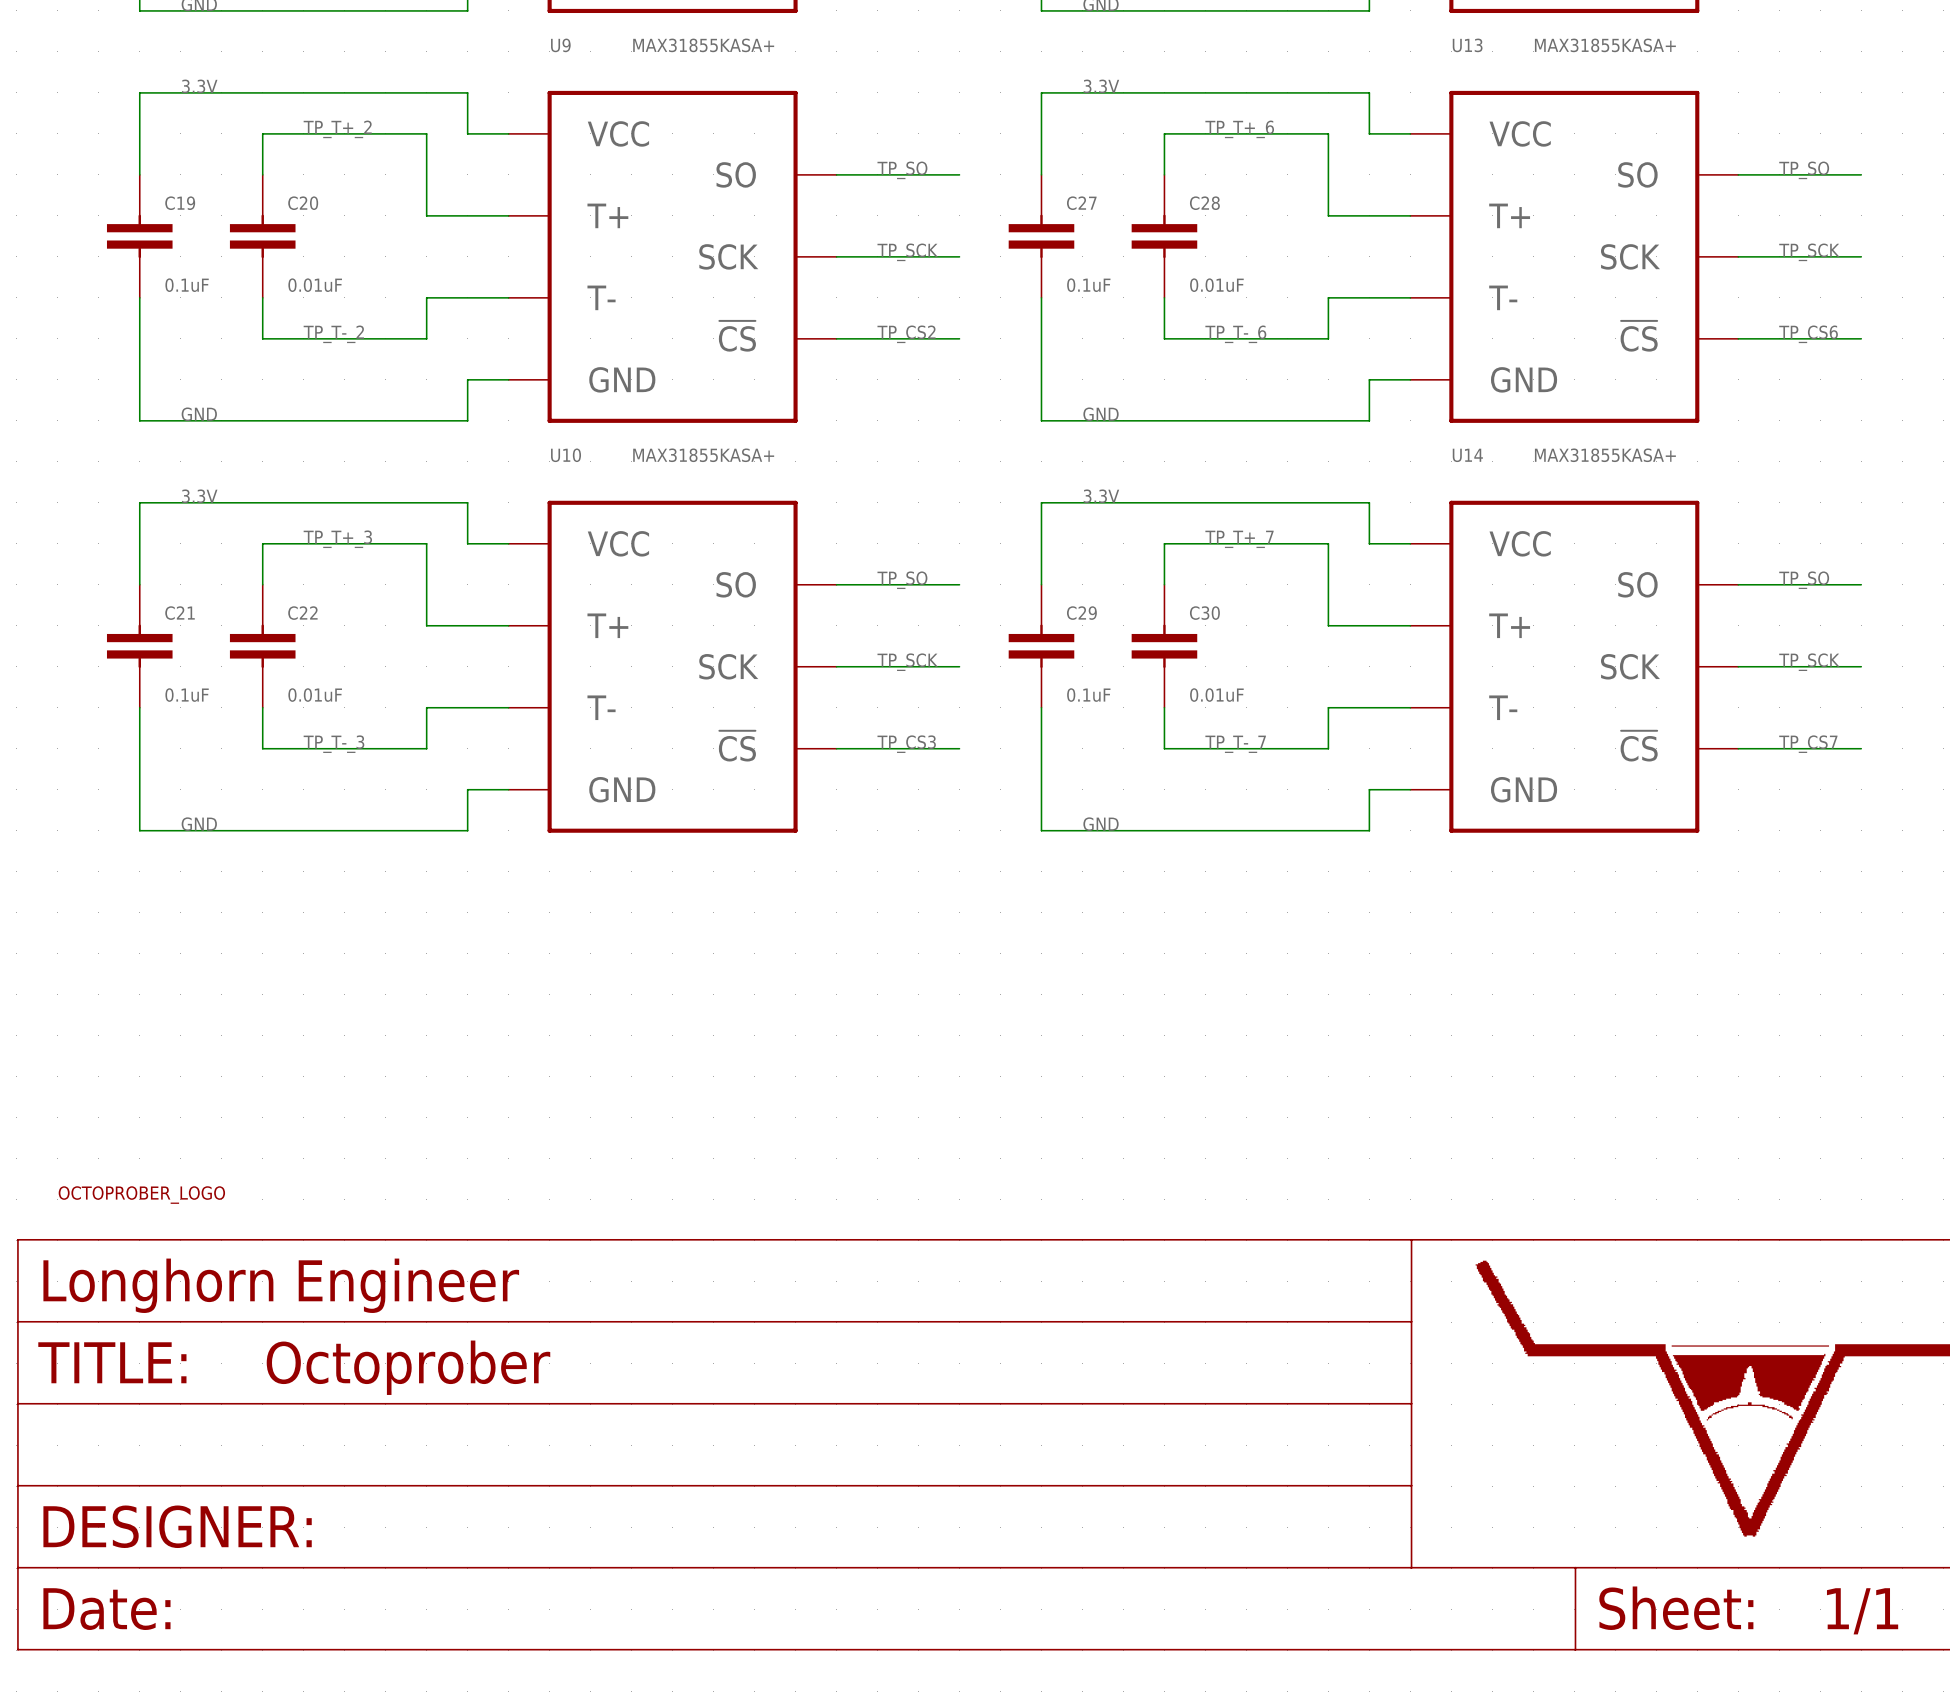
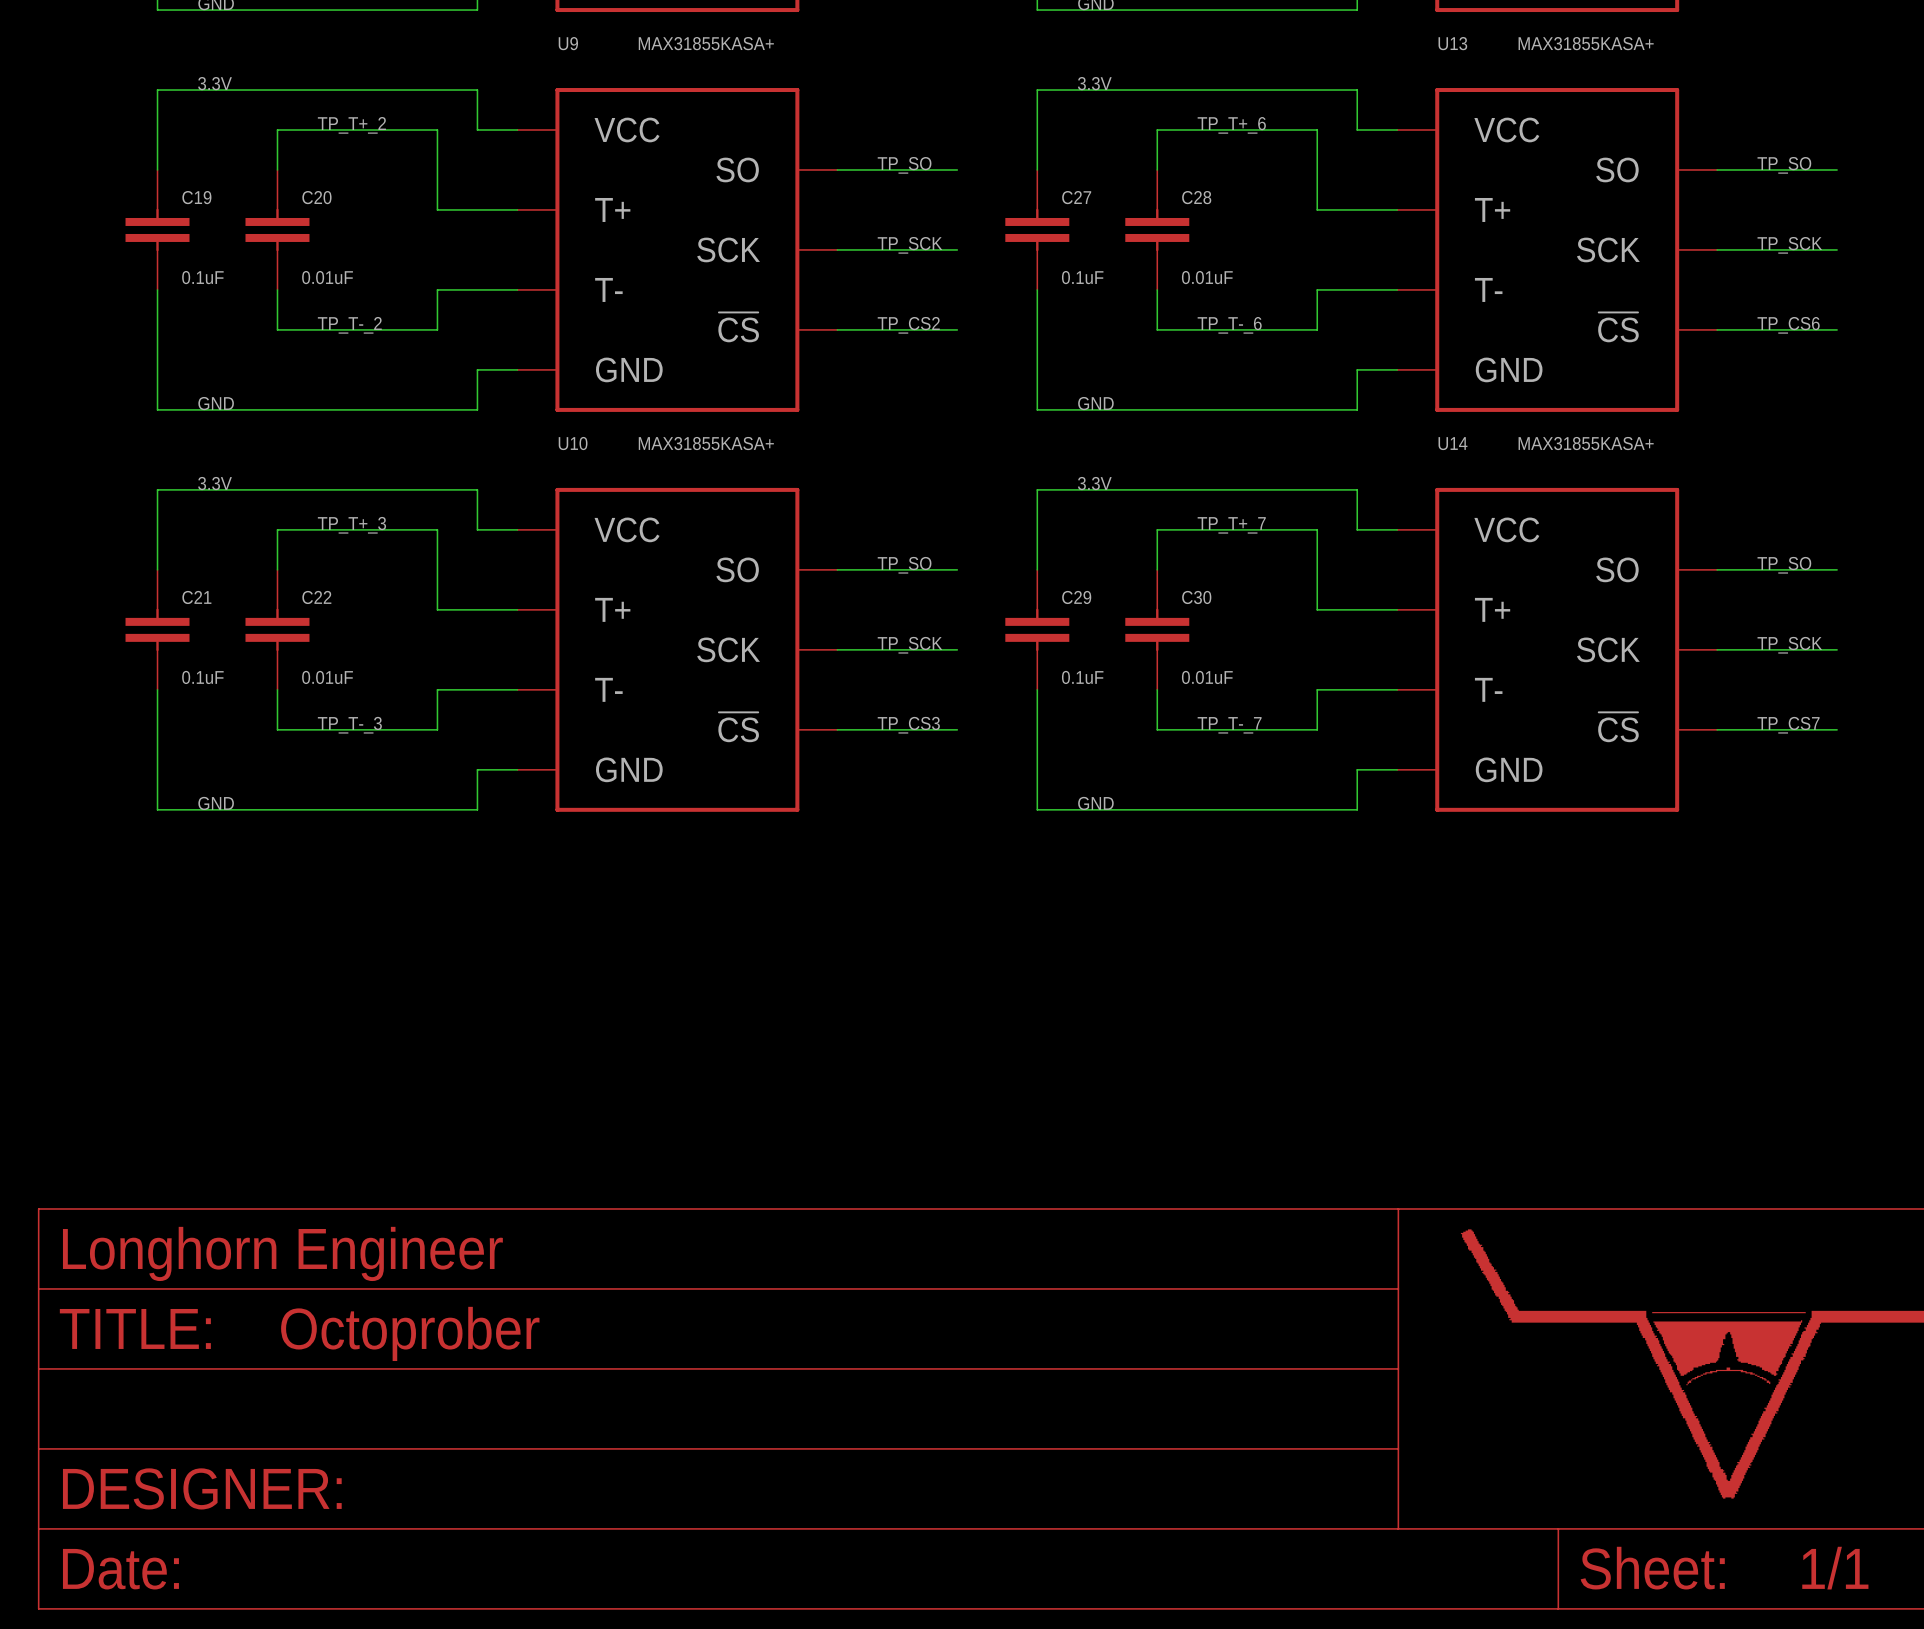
part: (141, 1195) -> none

